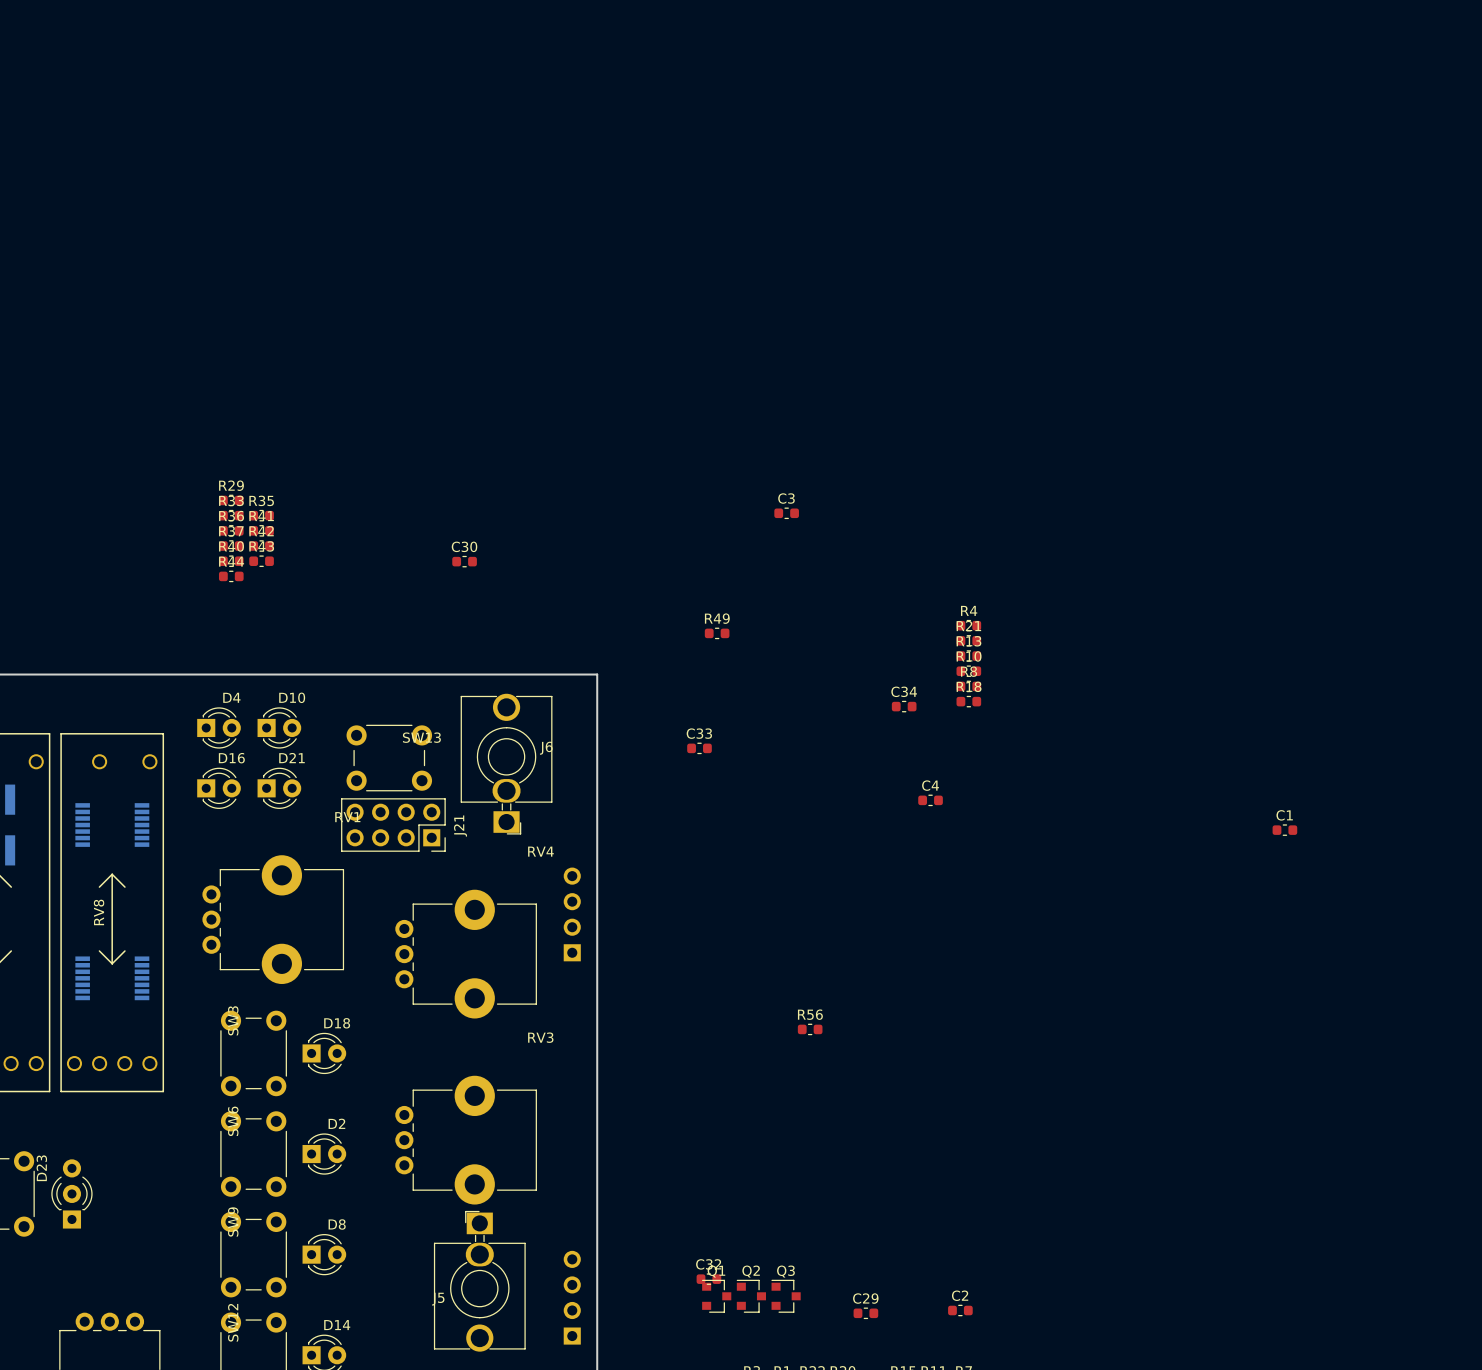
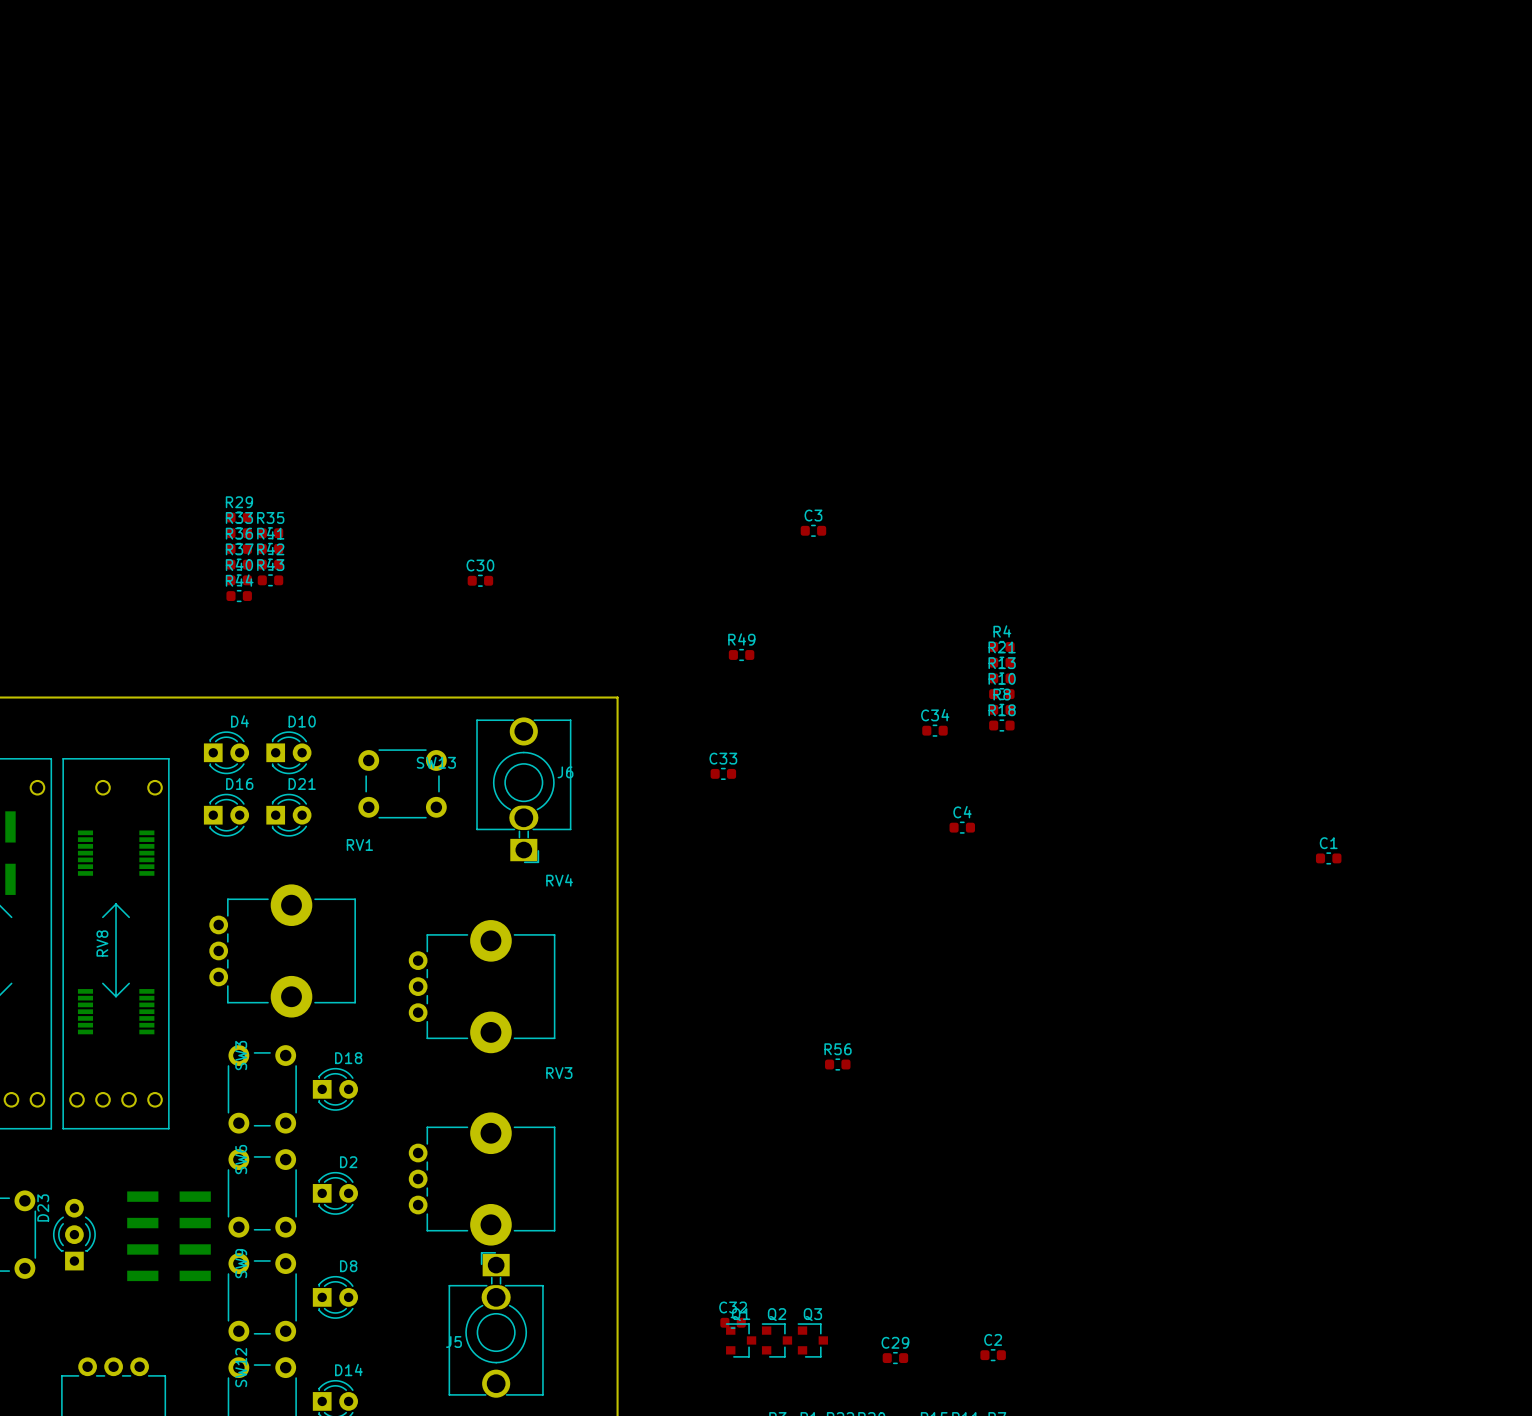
J21: (393, 825) -> none
part: (572, 914) -> none
part: none -> (169, 1236)
part: (572, 1297) -> none

